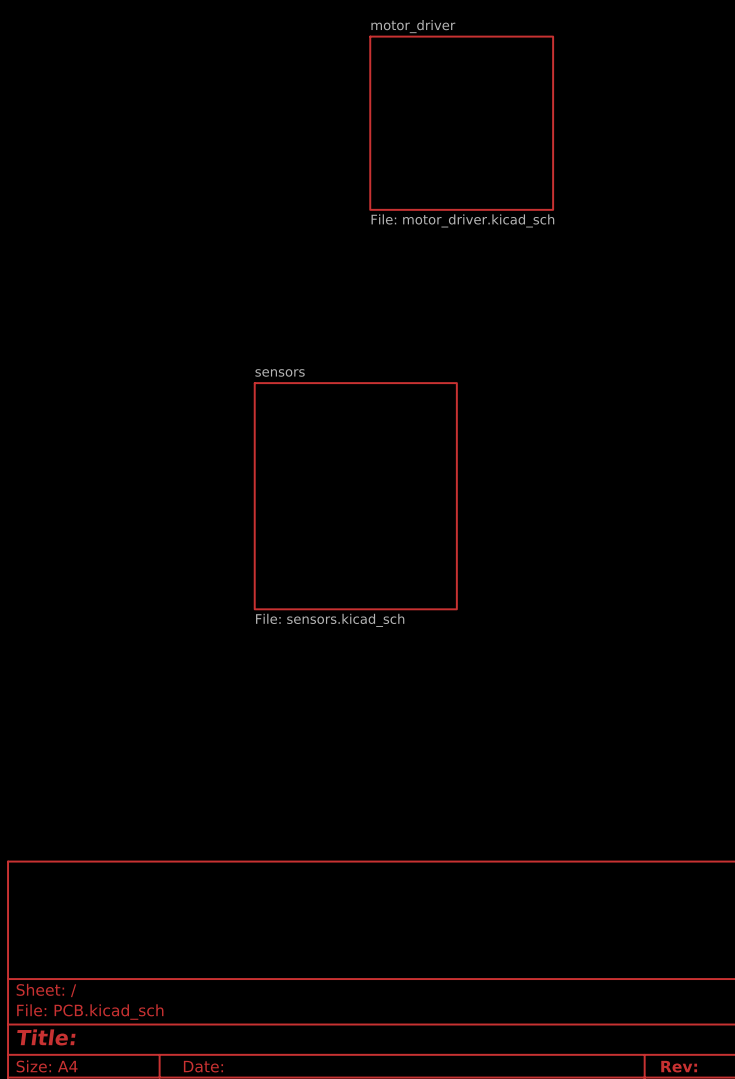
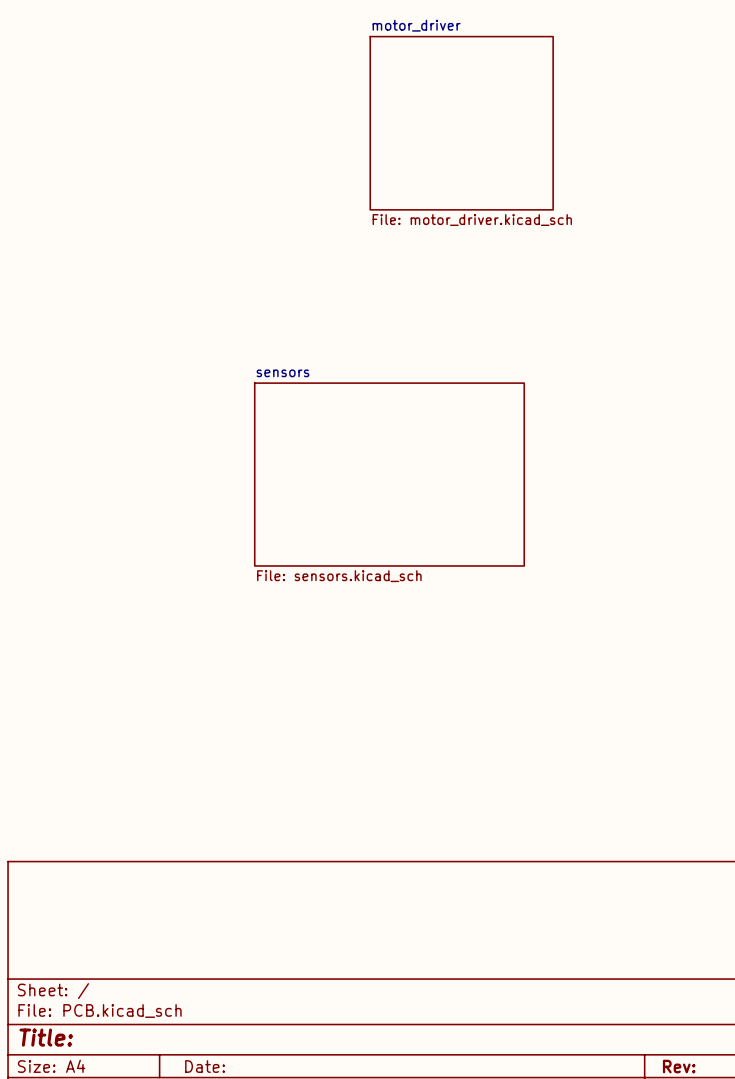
sheet sensors: none -> File: sensors.kicad_sch (389, 474)
sheet sensors: File: sensors.kicad_sch (355, 496) -> none

